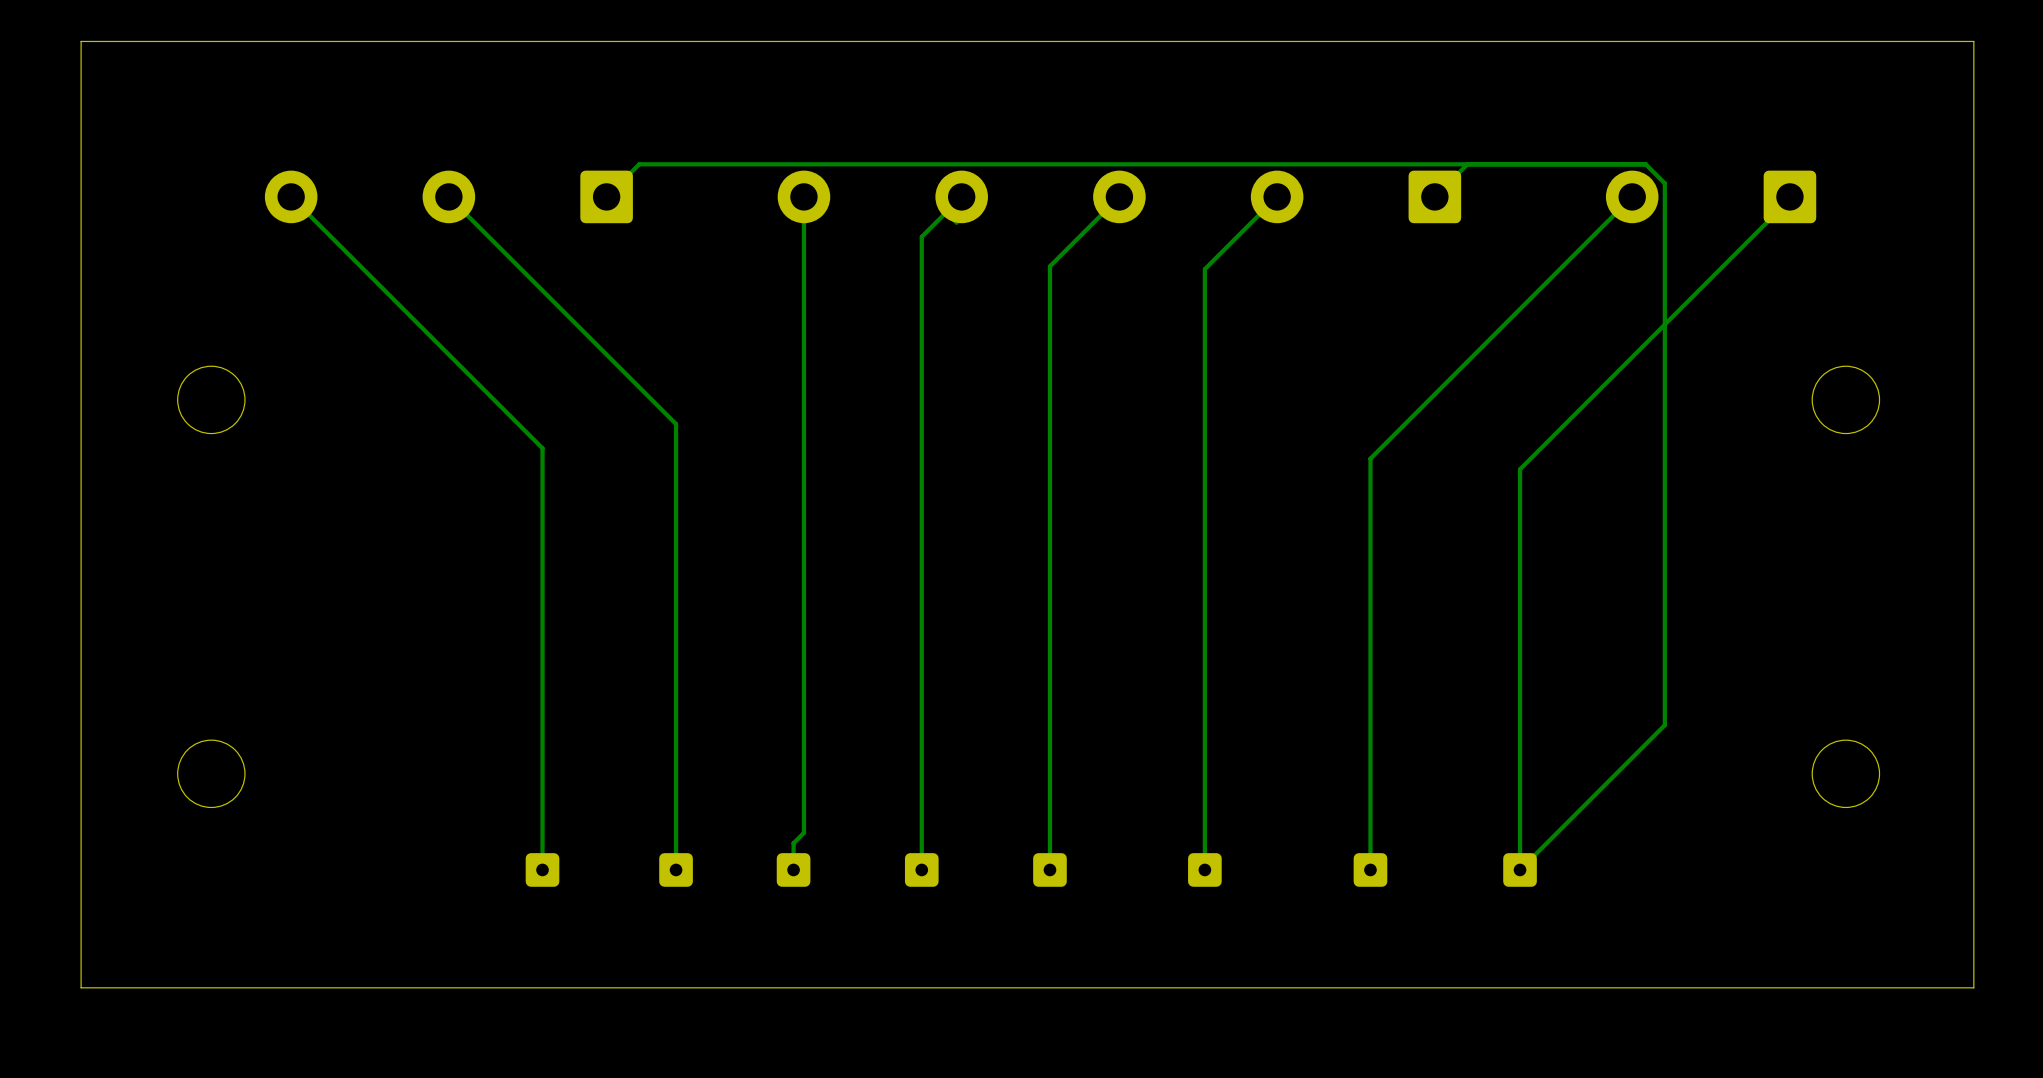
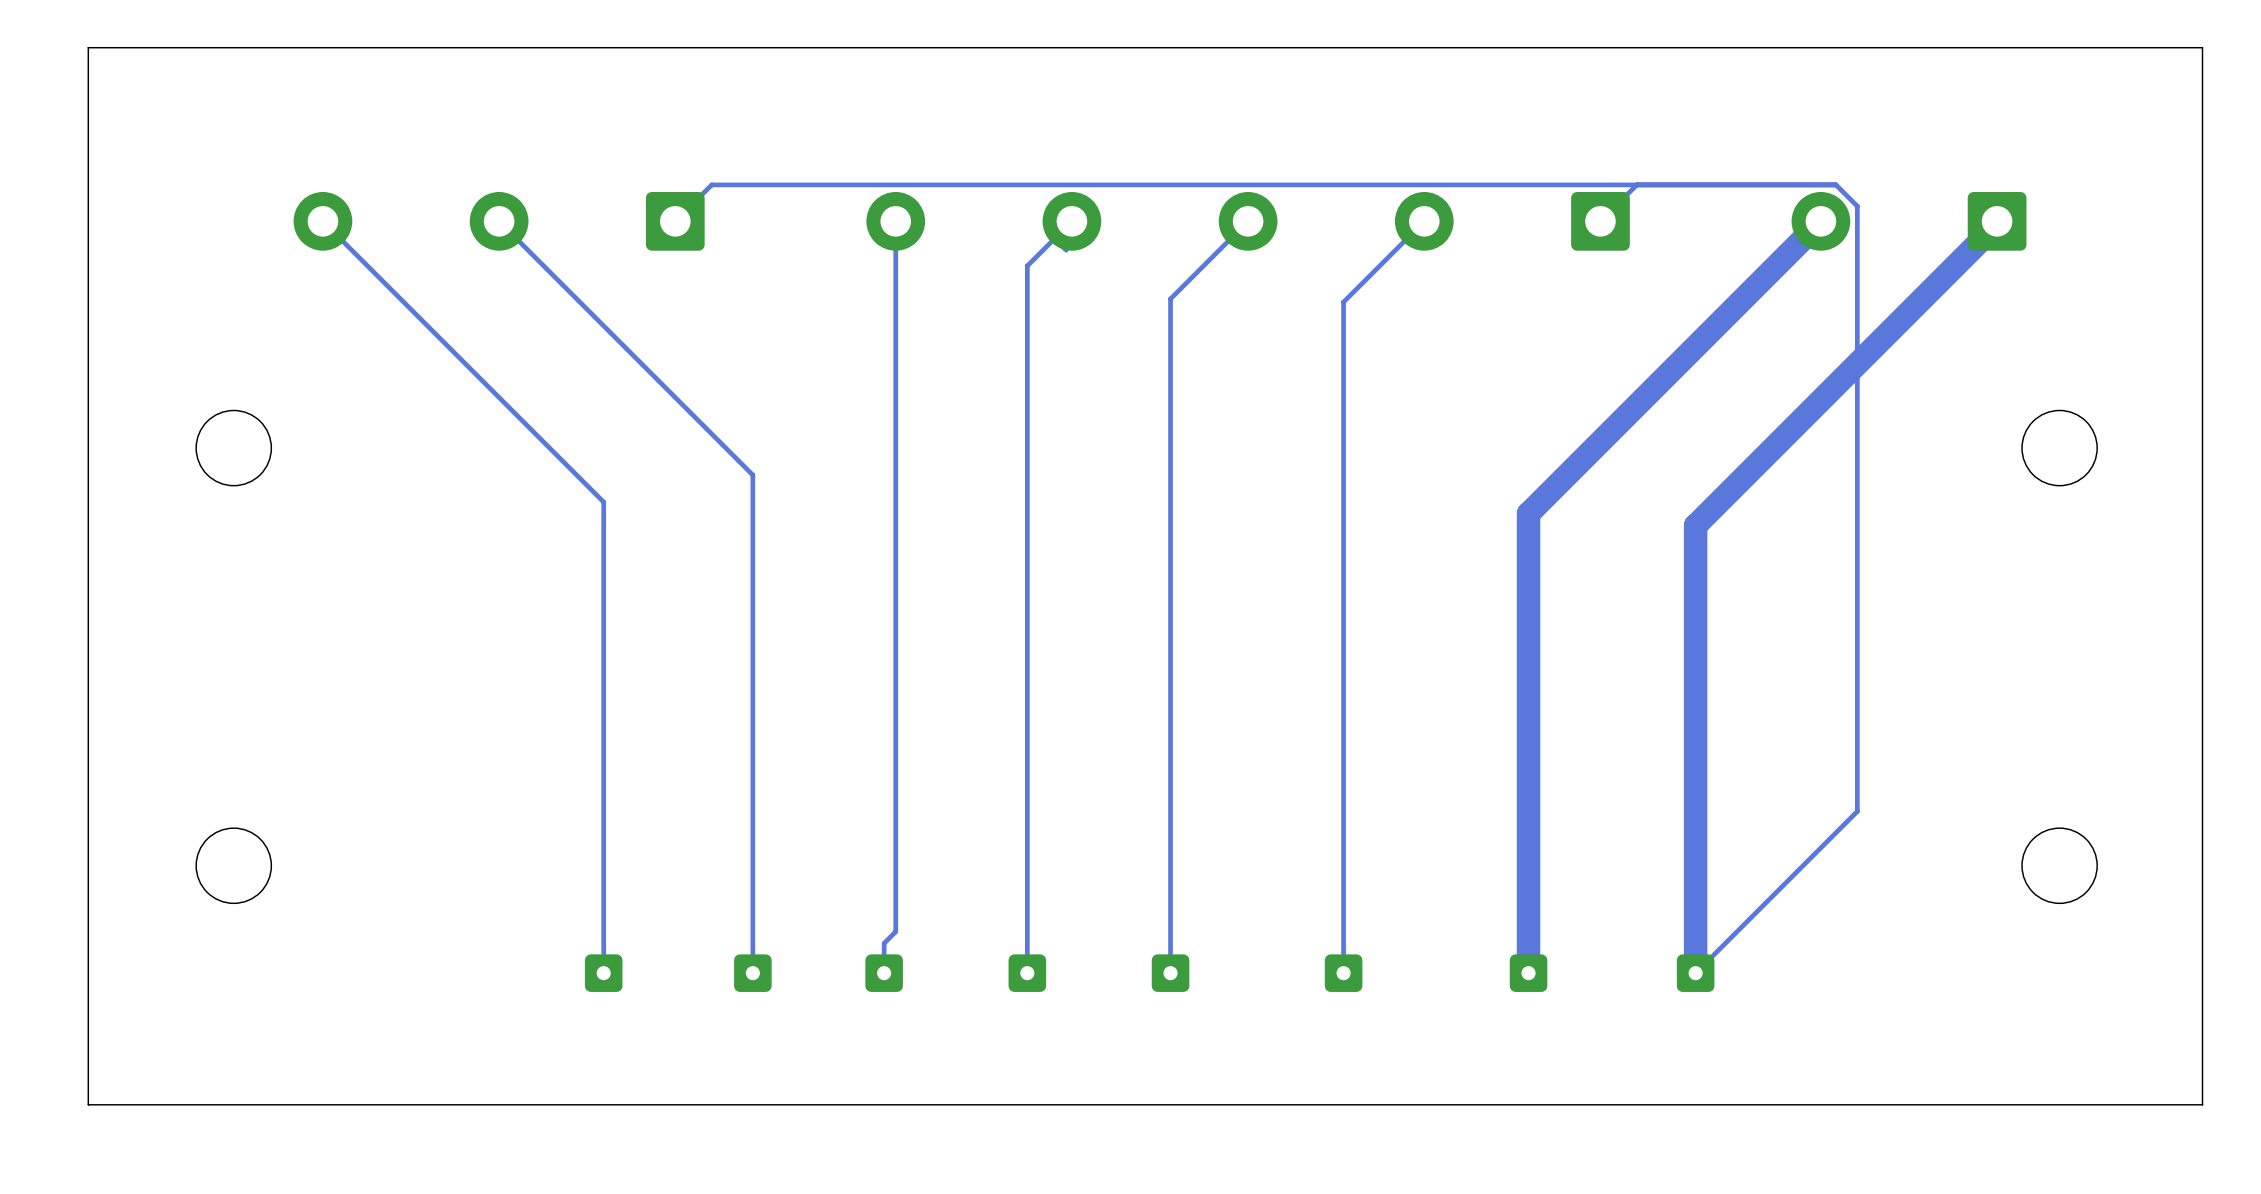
track width: thin (1632, 196) (1370, 458) (1370, 869) -> thick (1820, 221) (1528, 513) (1528, 973)
track width: thin (1789, 199) (1520, 469) (1520, 869) -> thick (1997, 224) (1695, 525) (1695, 973)

